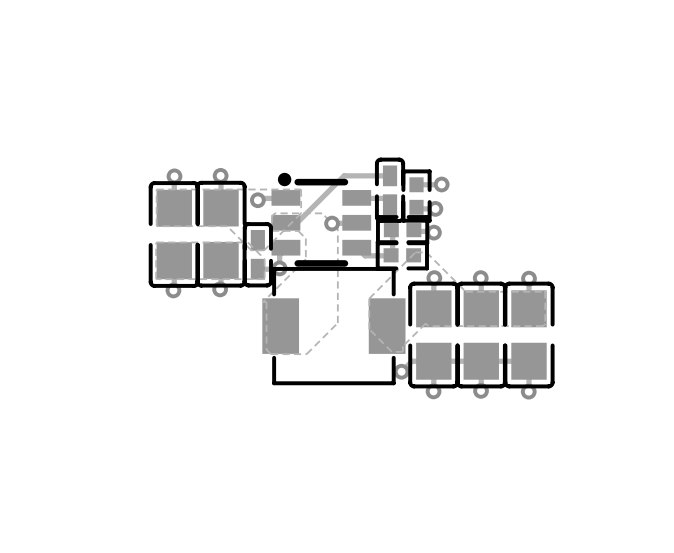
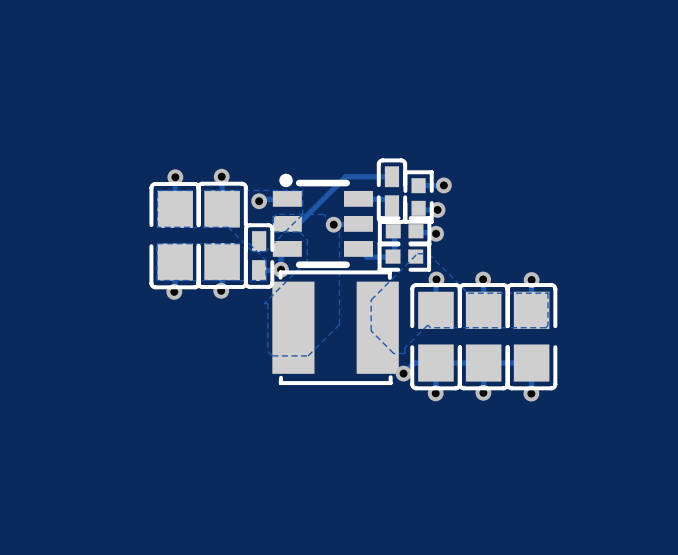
part footprint: [262, 266, 406, 386] -> [272, 270, 399, 386]

